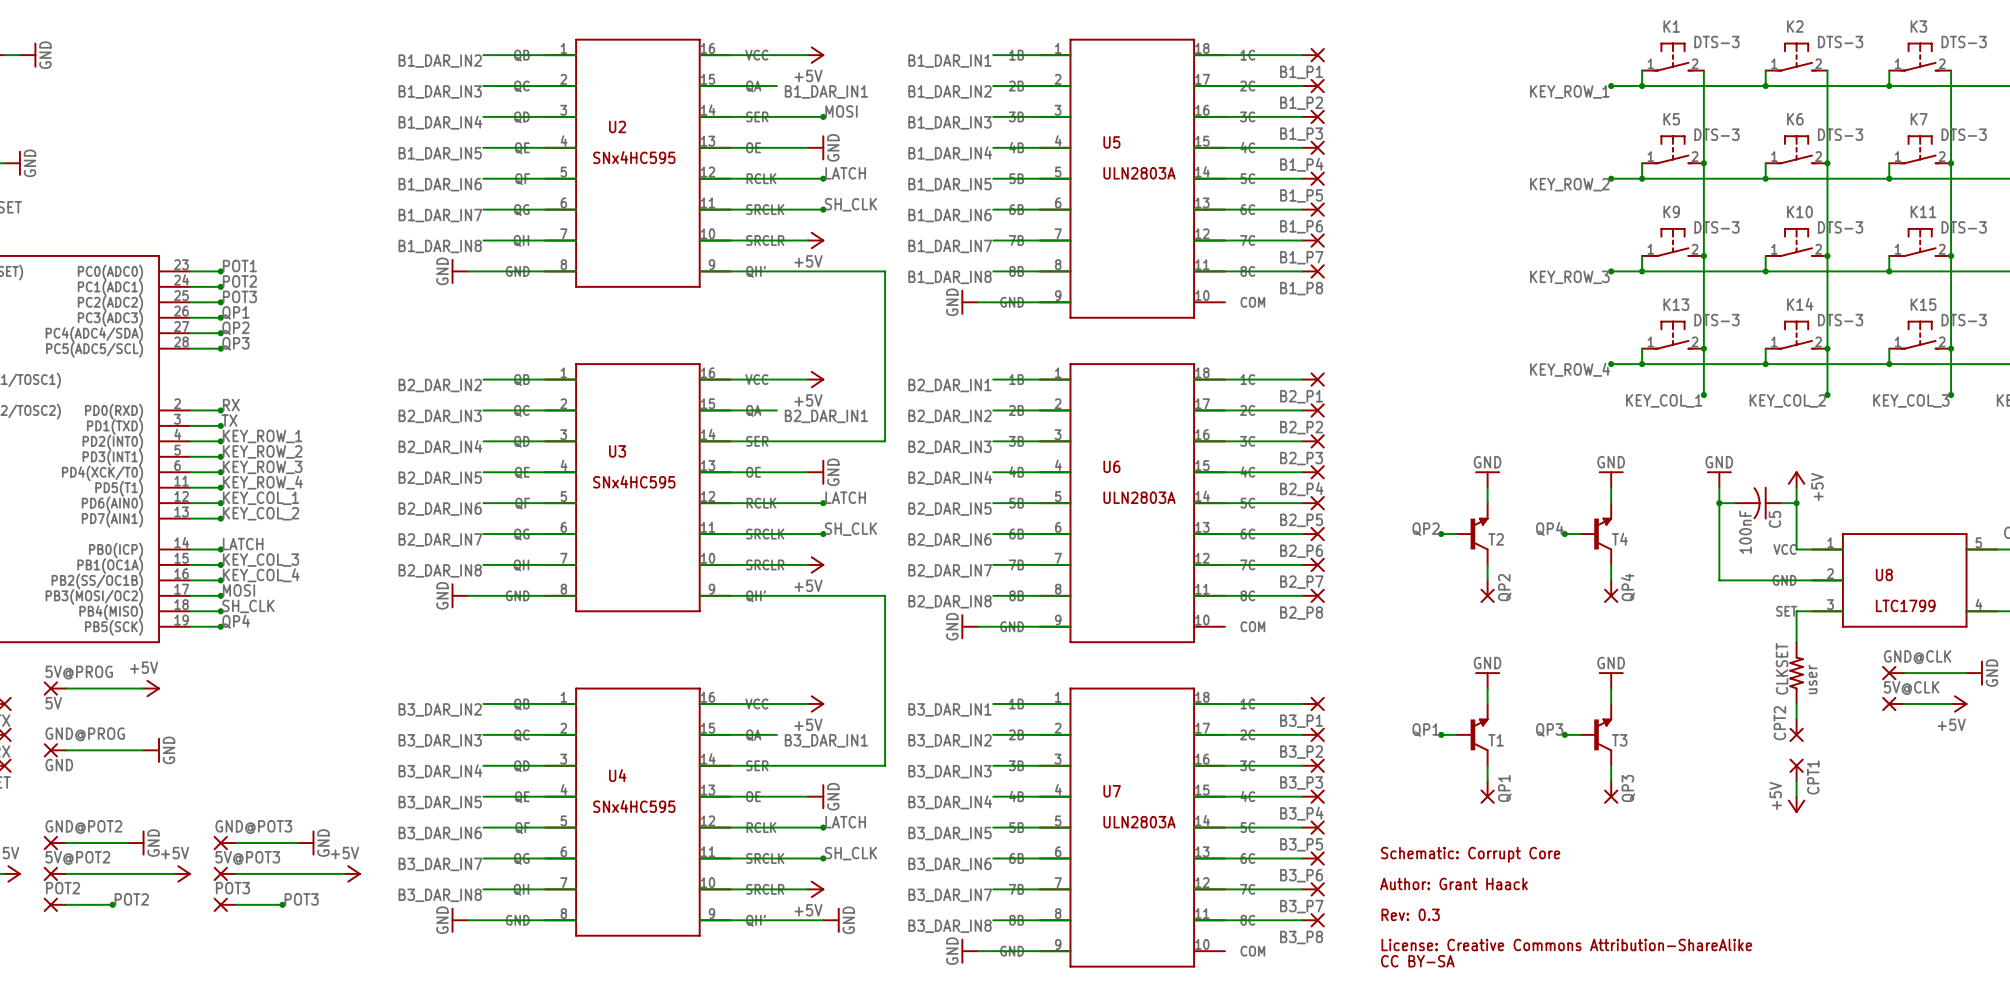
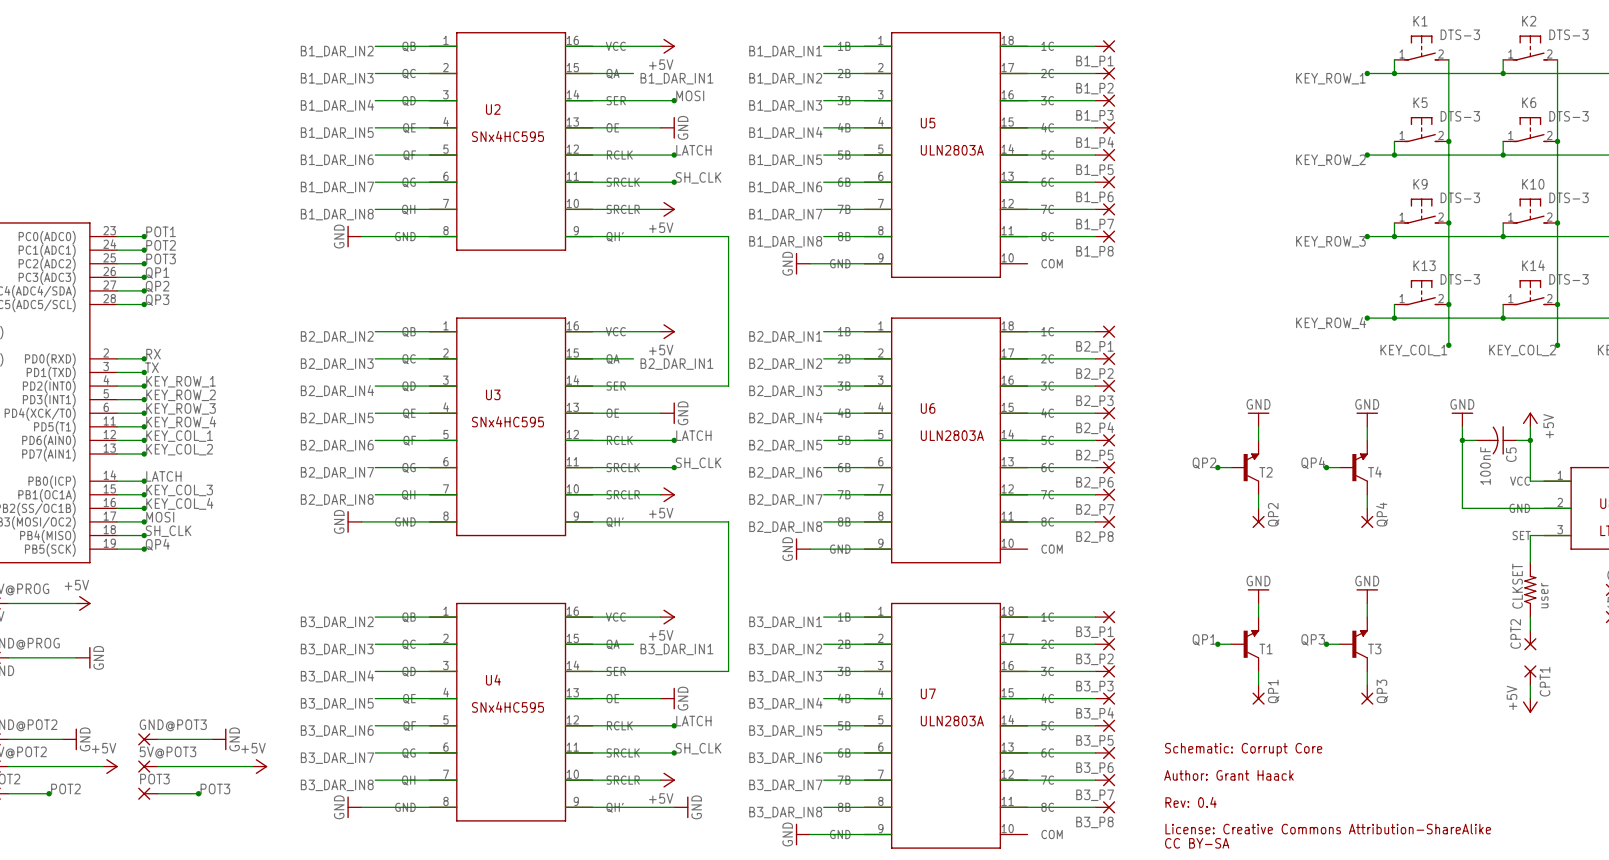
text: Rev: 0.3 (1410, 914) -> Rev: 0.4 (1191, 802)

